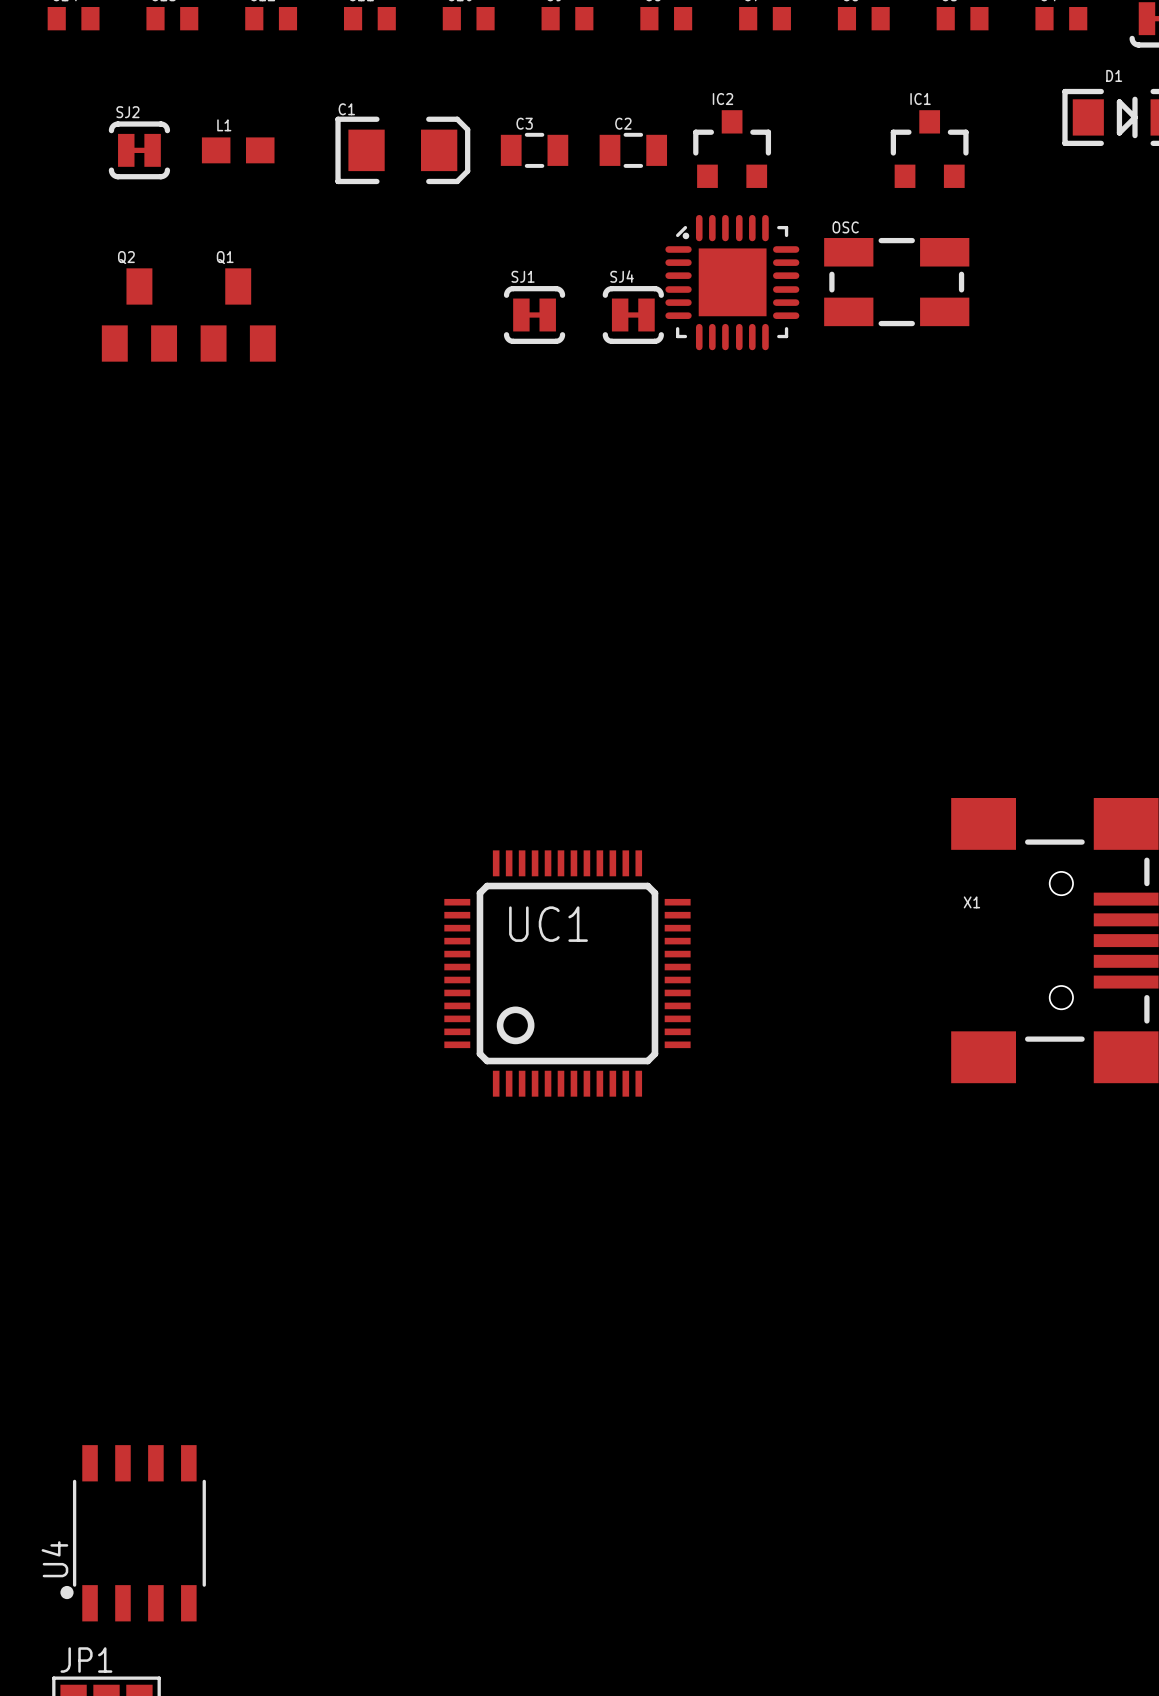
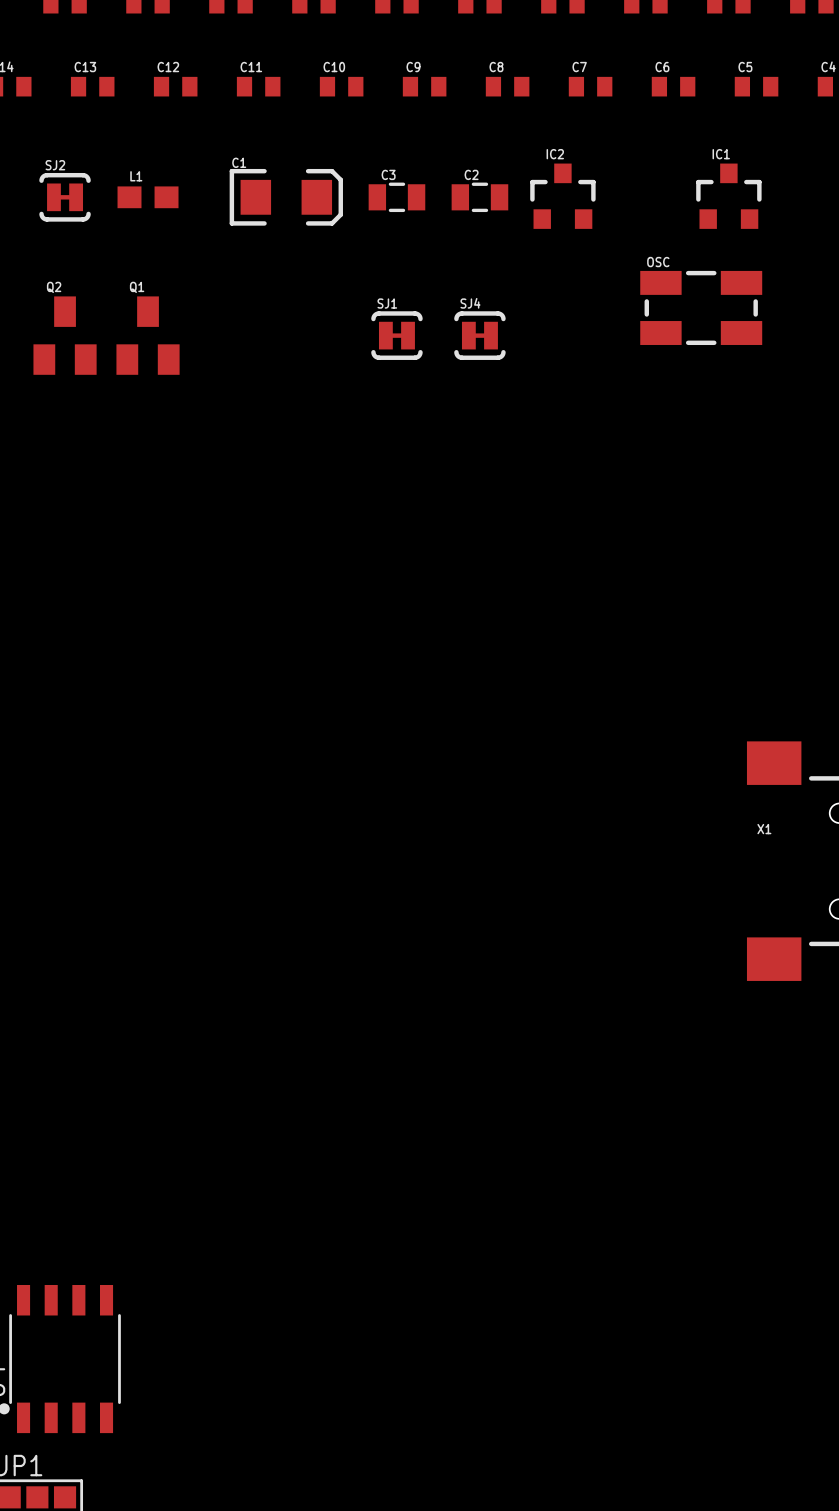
part: (732, 282) -> none
UC1: (567, 973) -> none

